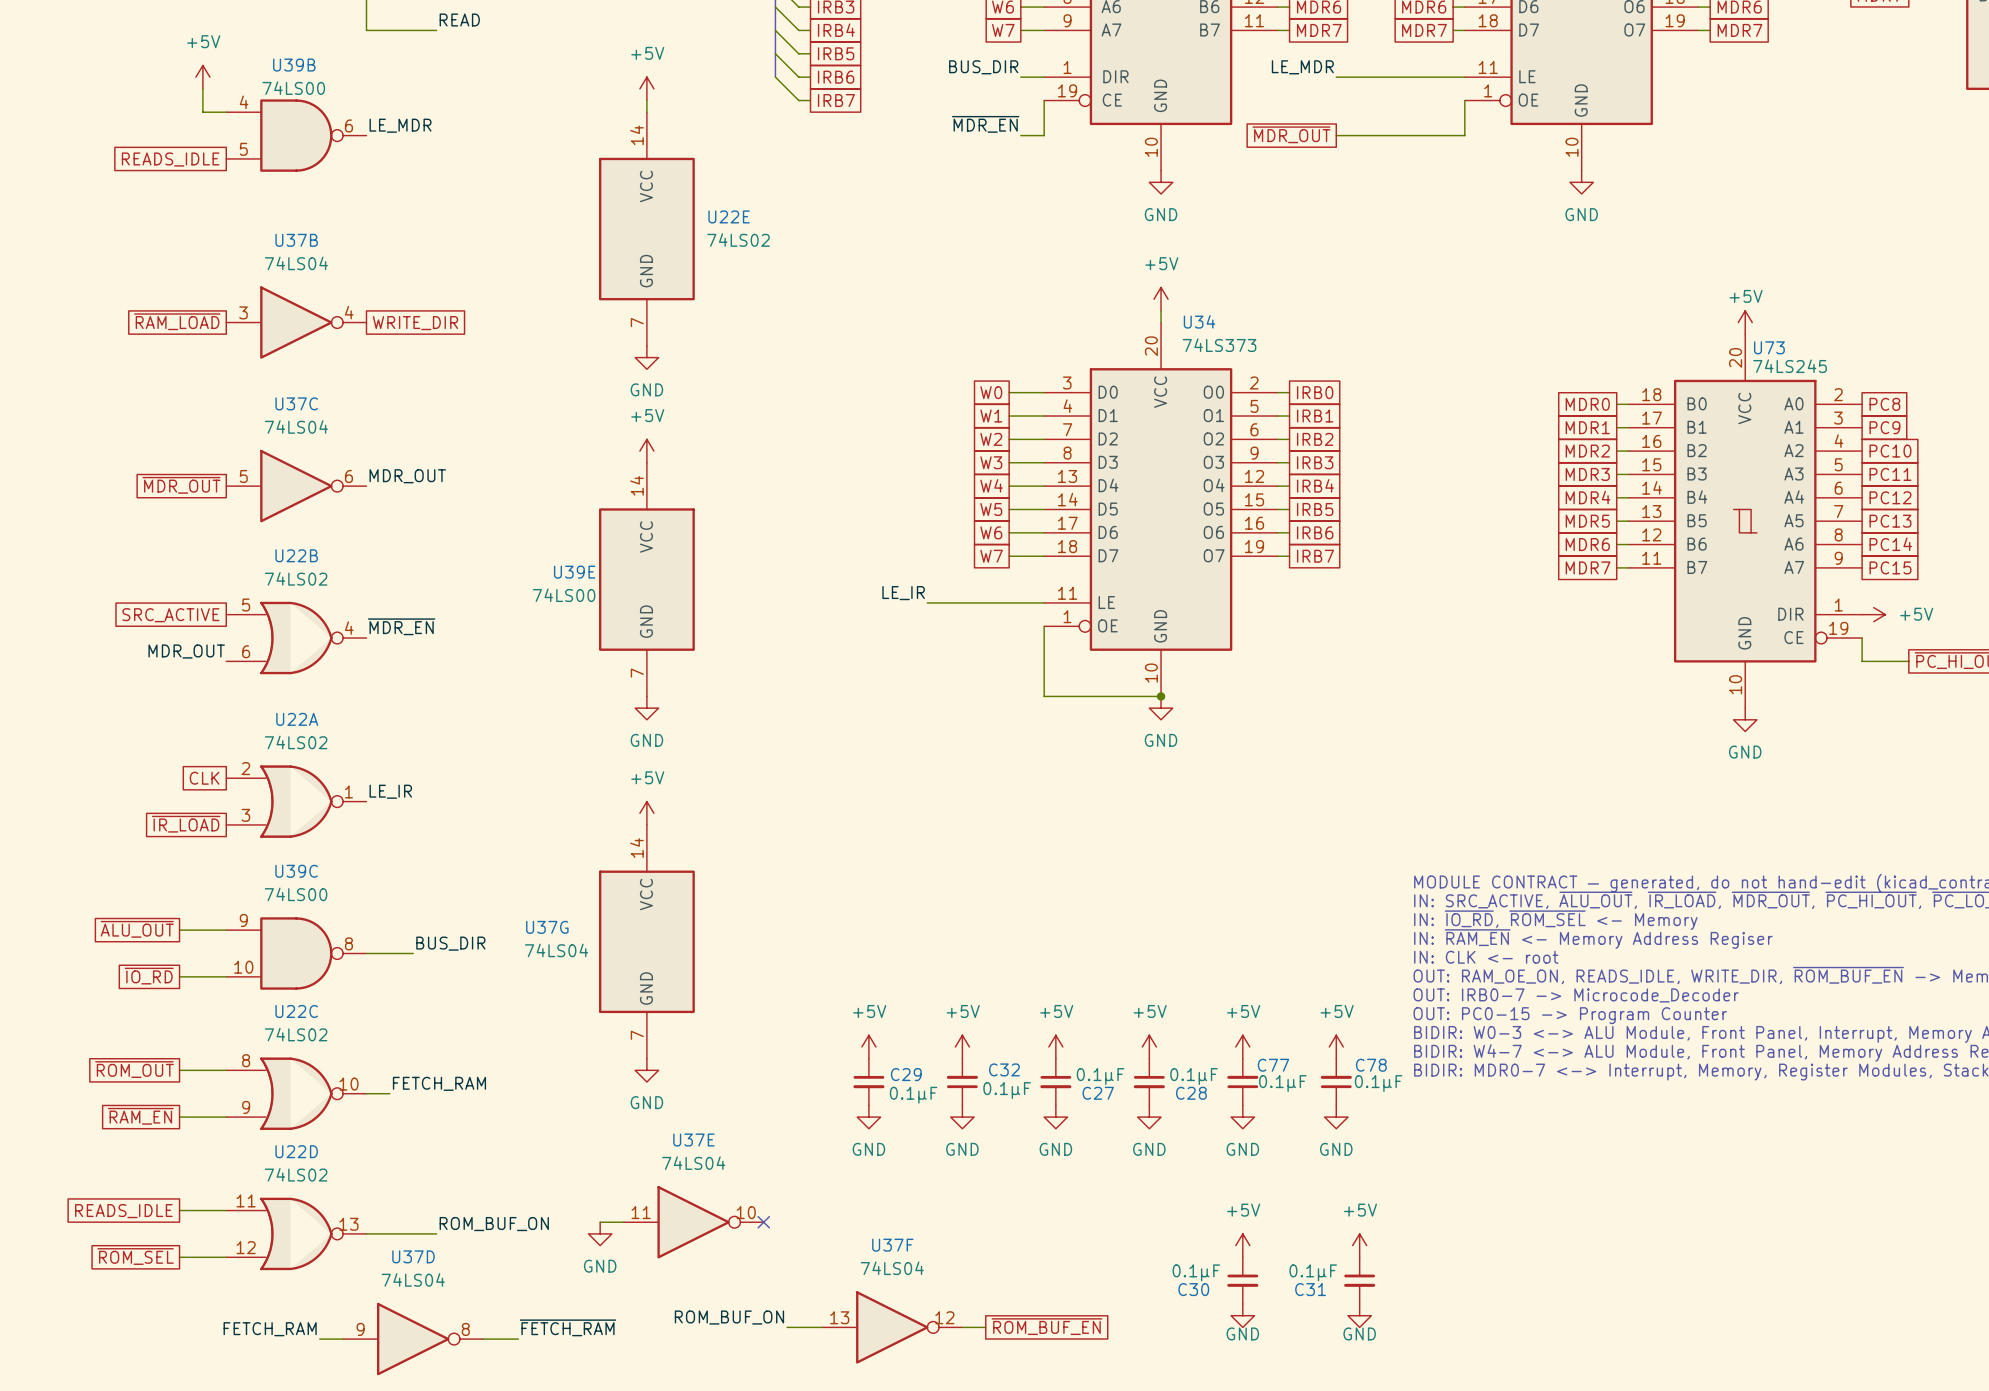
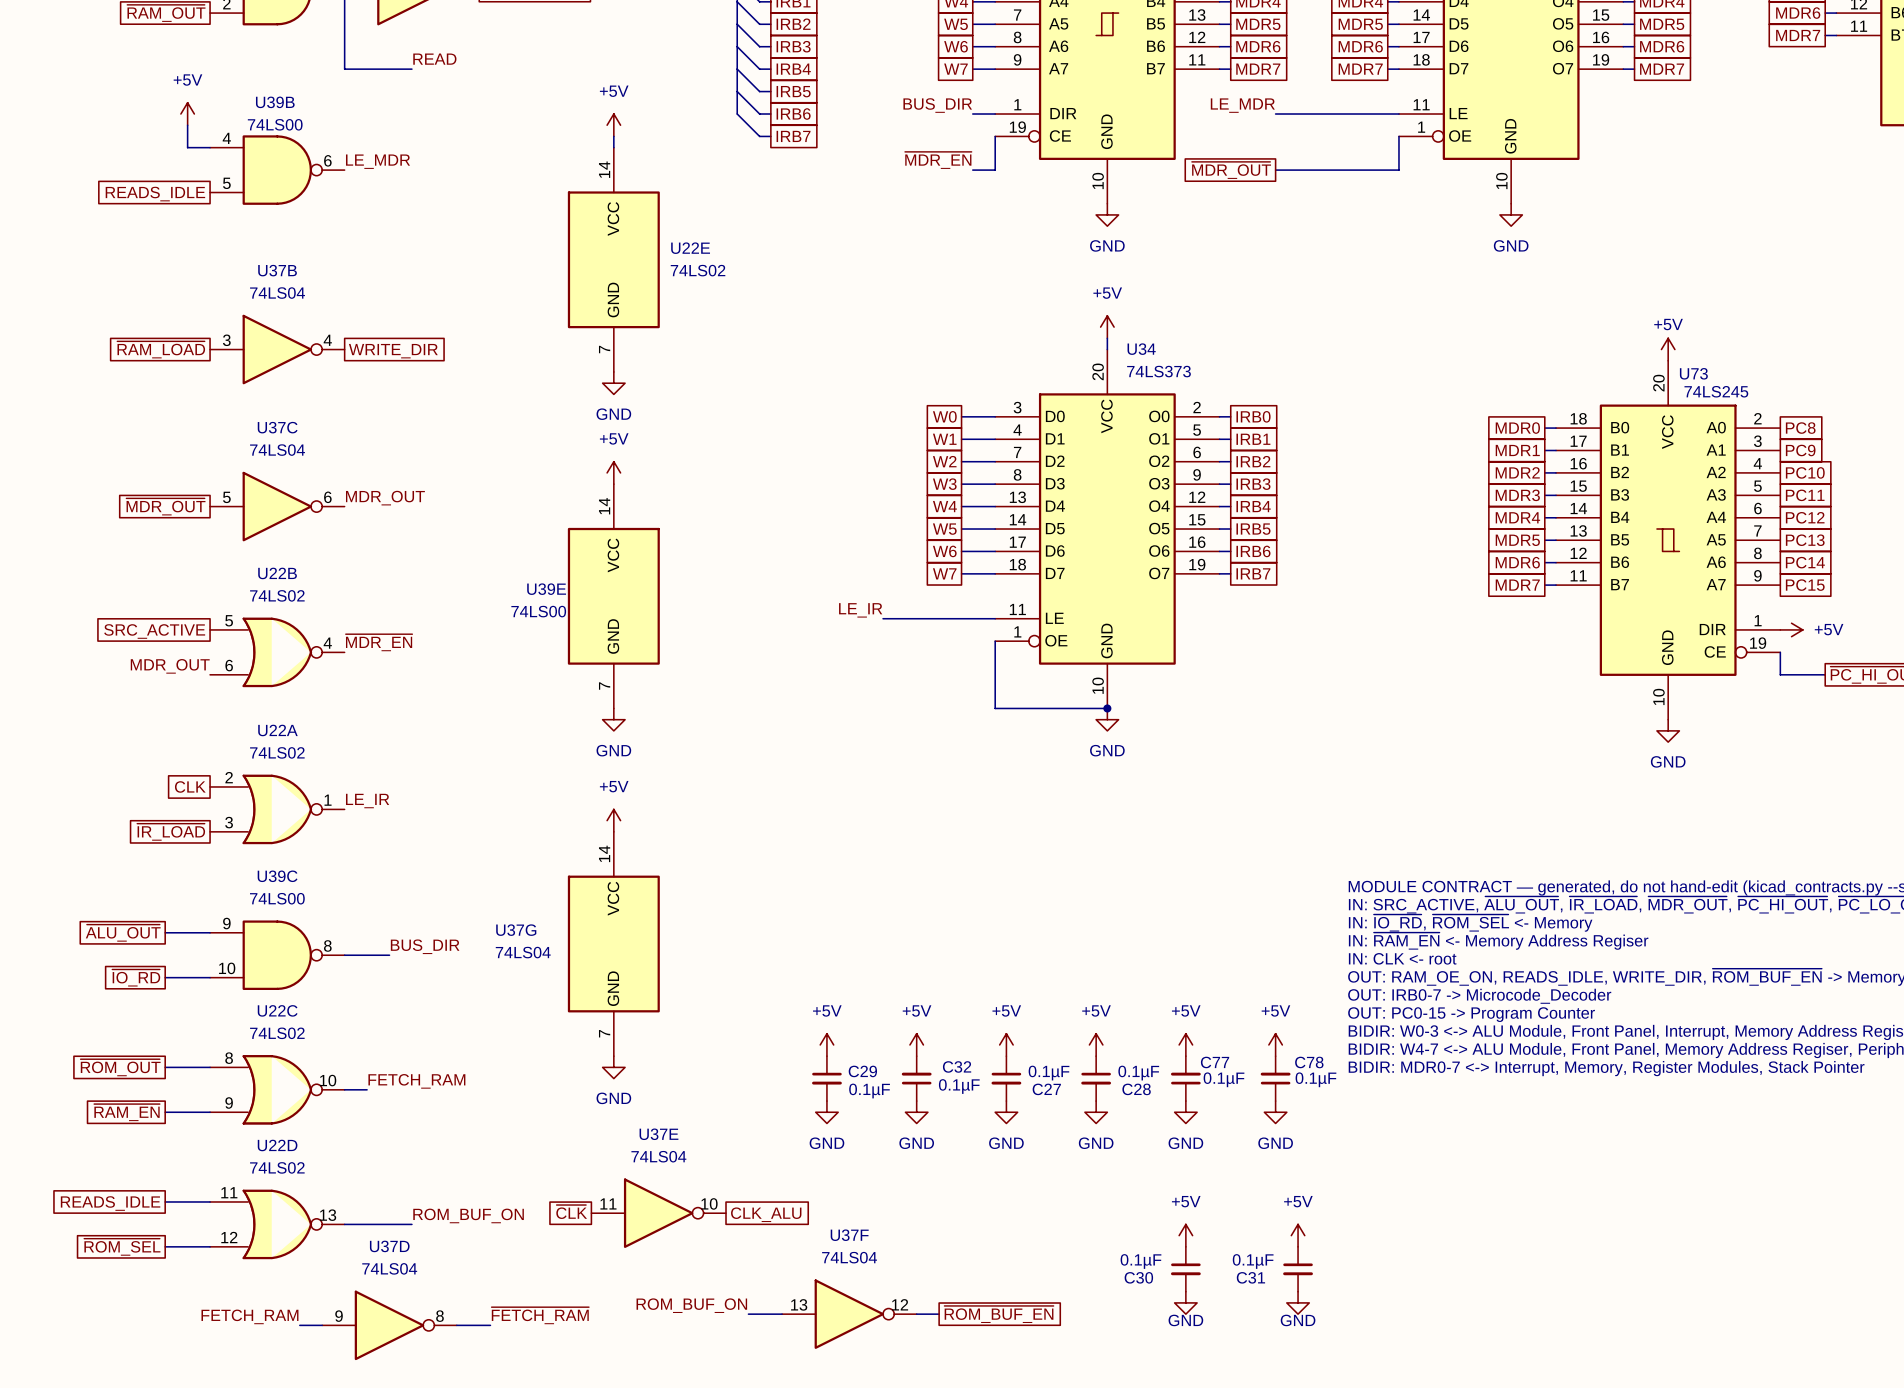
global label: none -> ~{CLK} (571, 1211)
wire: (600, 1222) (623, 1222) -> none
no-connect mark: (763, 1222) -> none
global label: none -> CLK_ALU (766, 1214)
power symbol: GND (600, 1233) -> none

